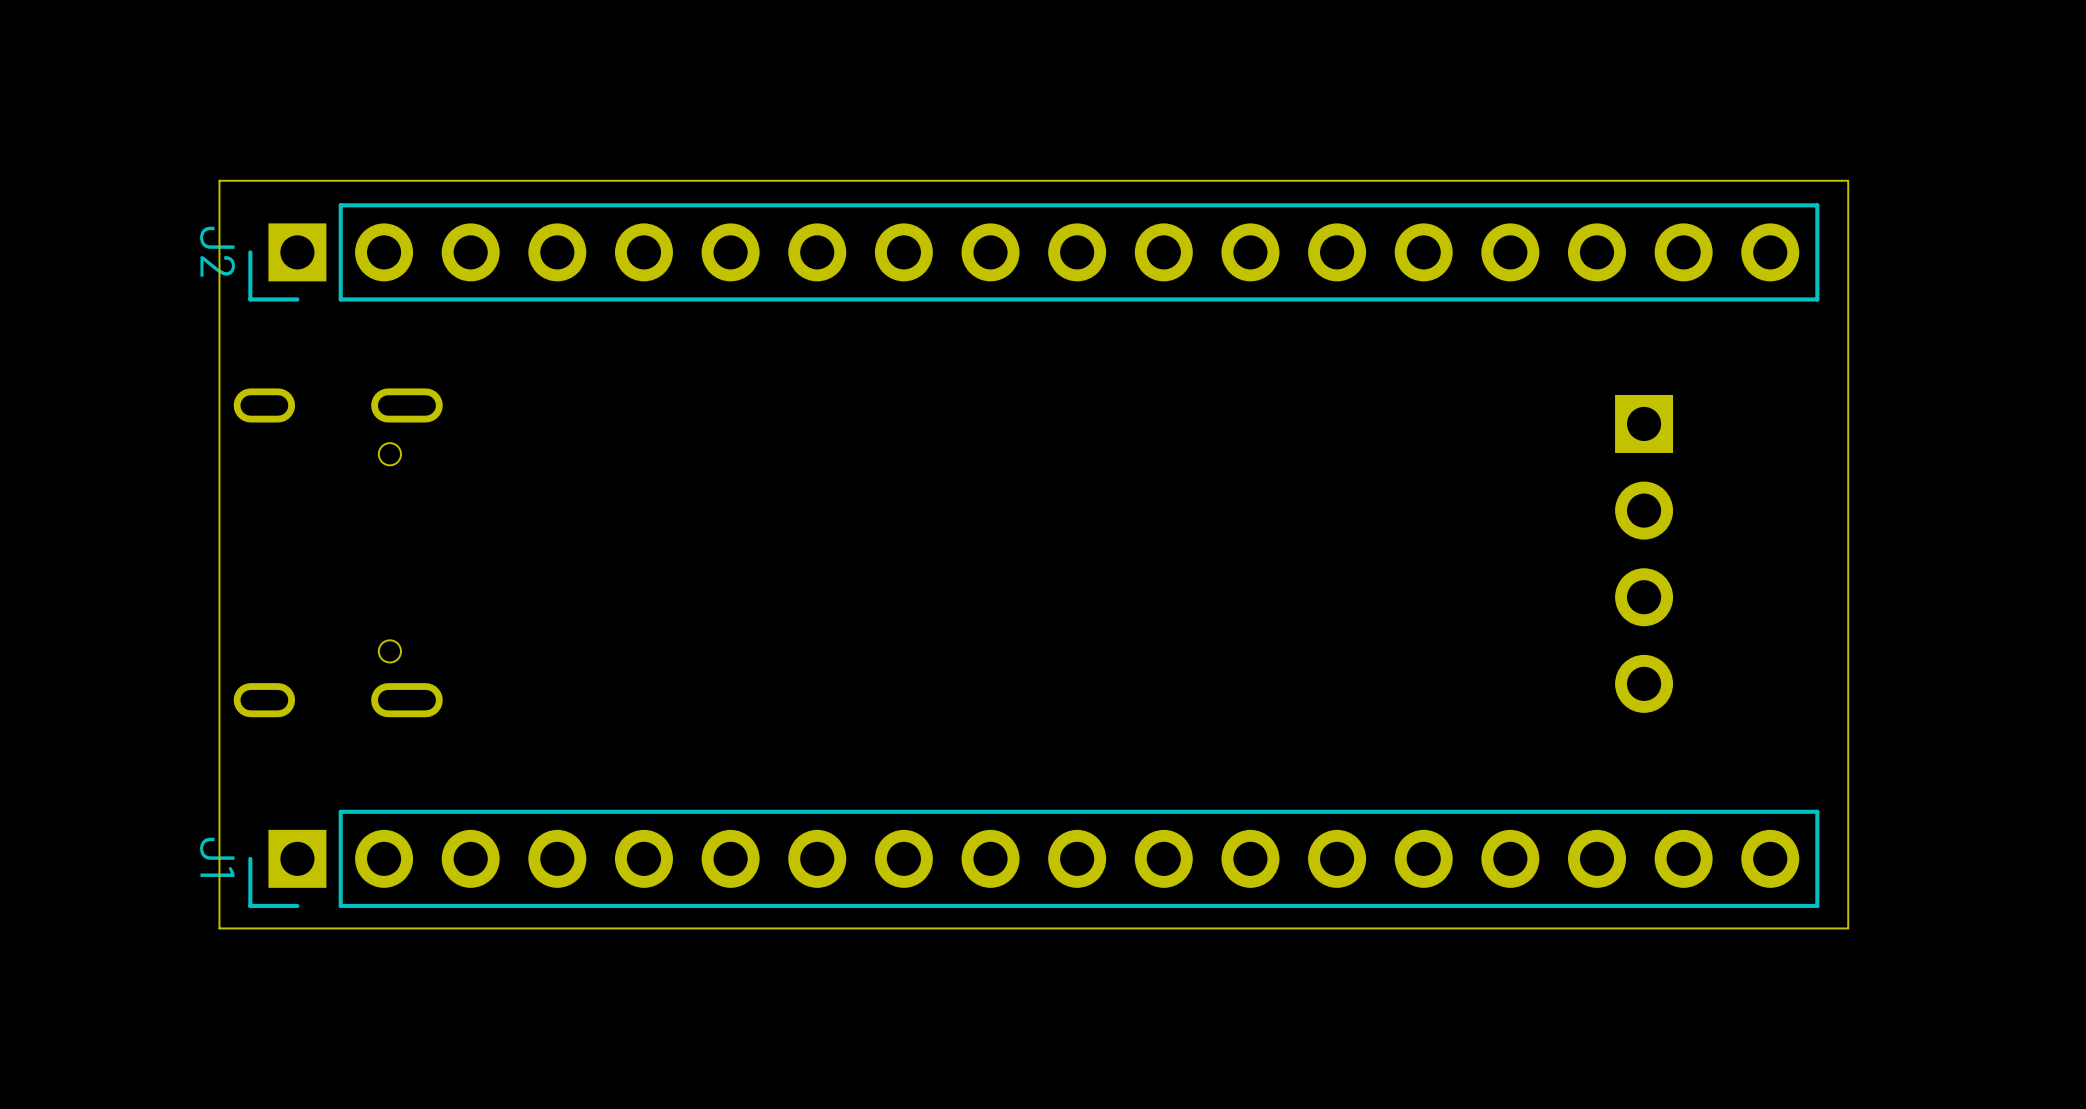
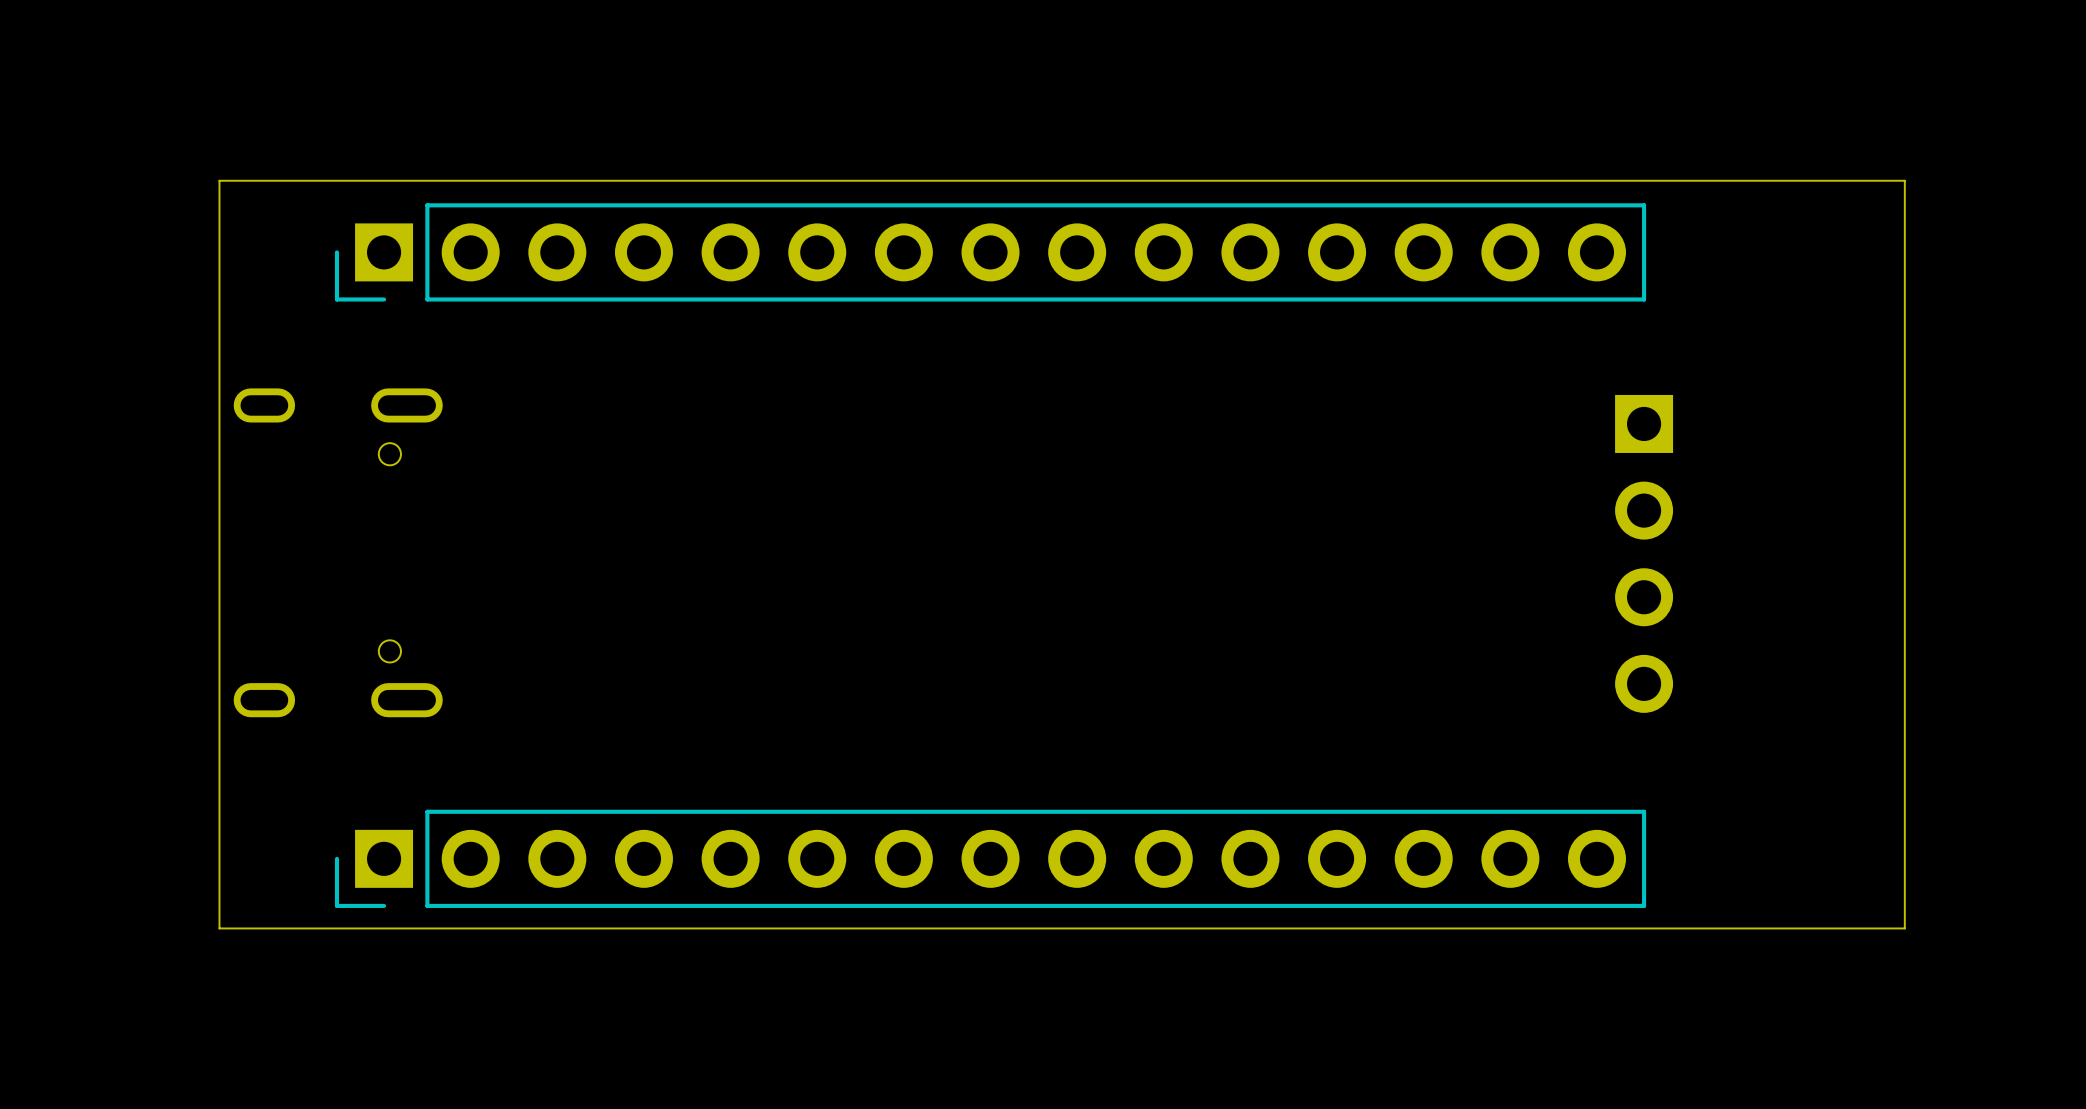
board edge: (1848, 180) (1848, 928) -> (1848, 180) (1904, 180) (1904, 928) (1848, 928)
part: none -> (990, 252)
J2: (1033, 252) -> none
part: none -> (990, 858)
J1: (1033, 858) -> none

